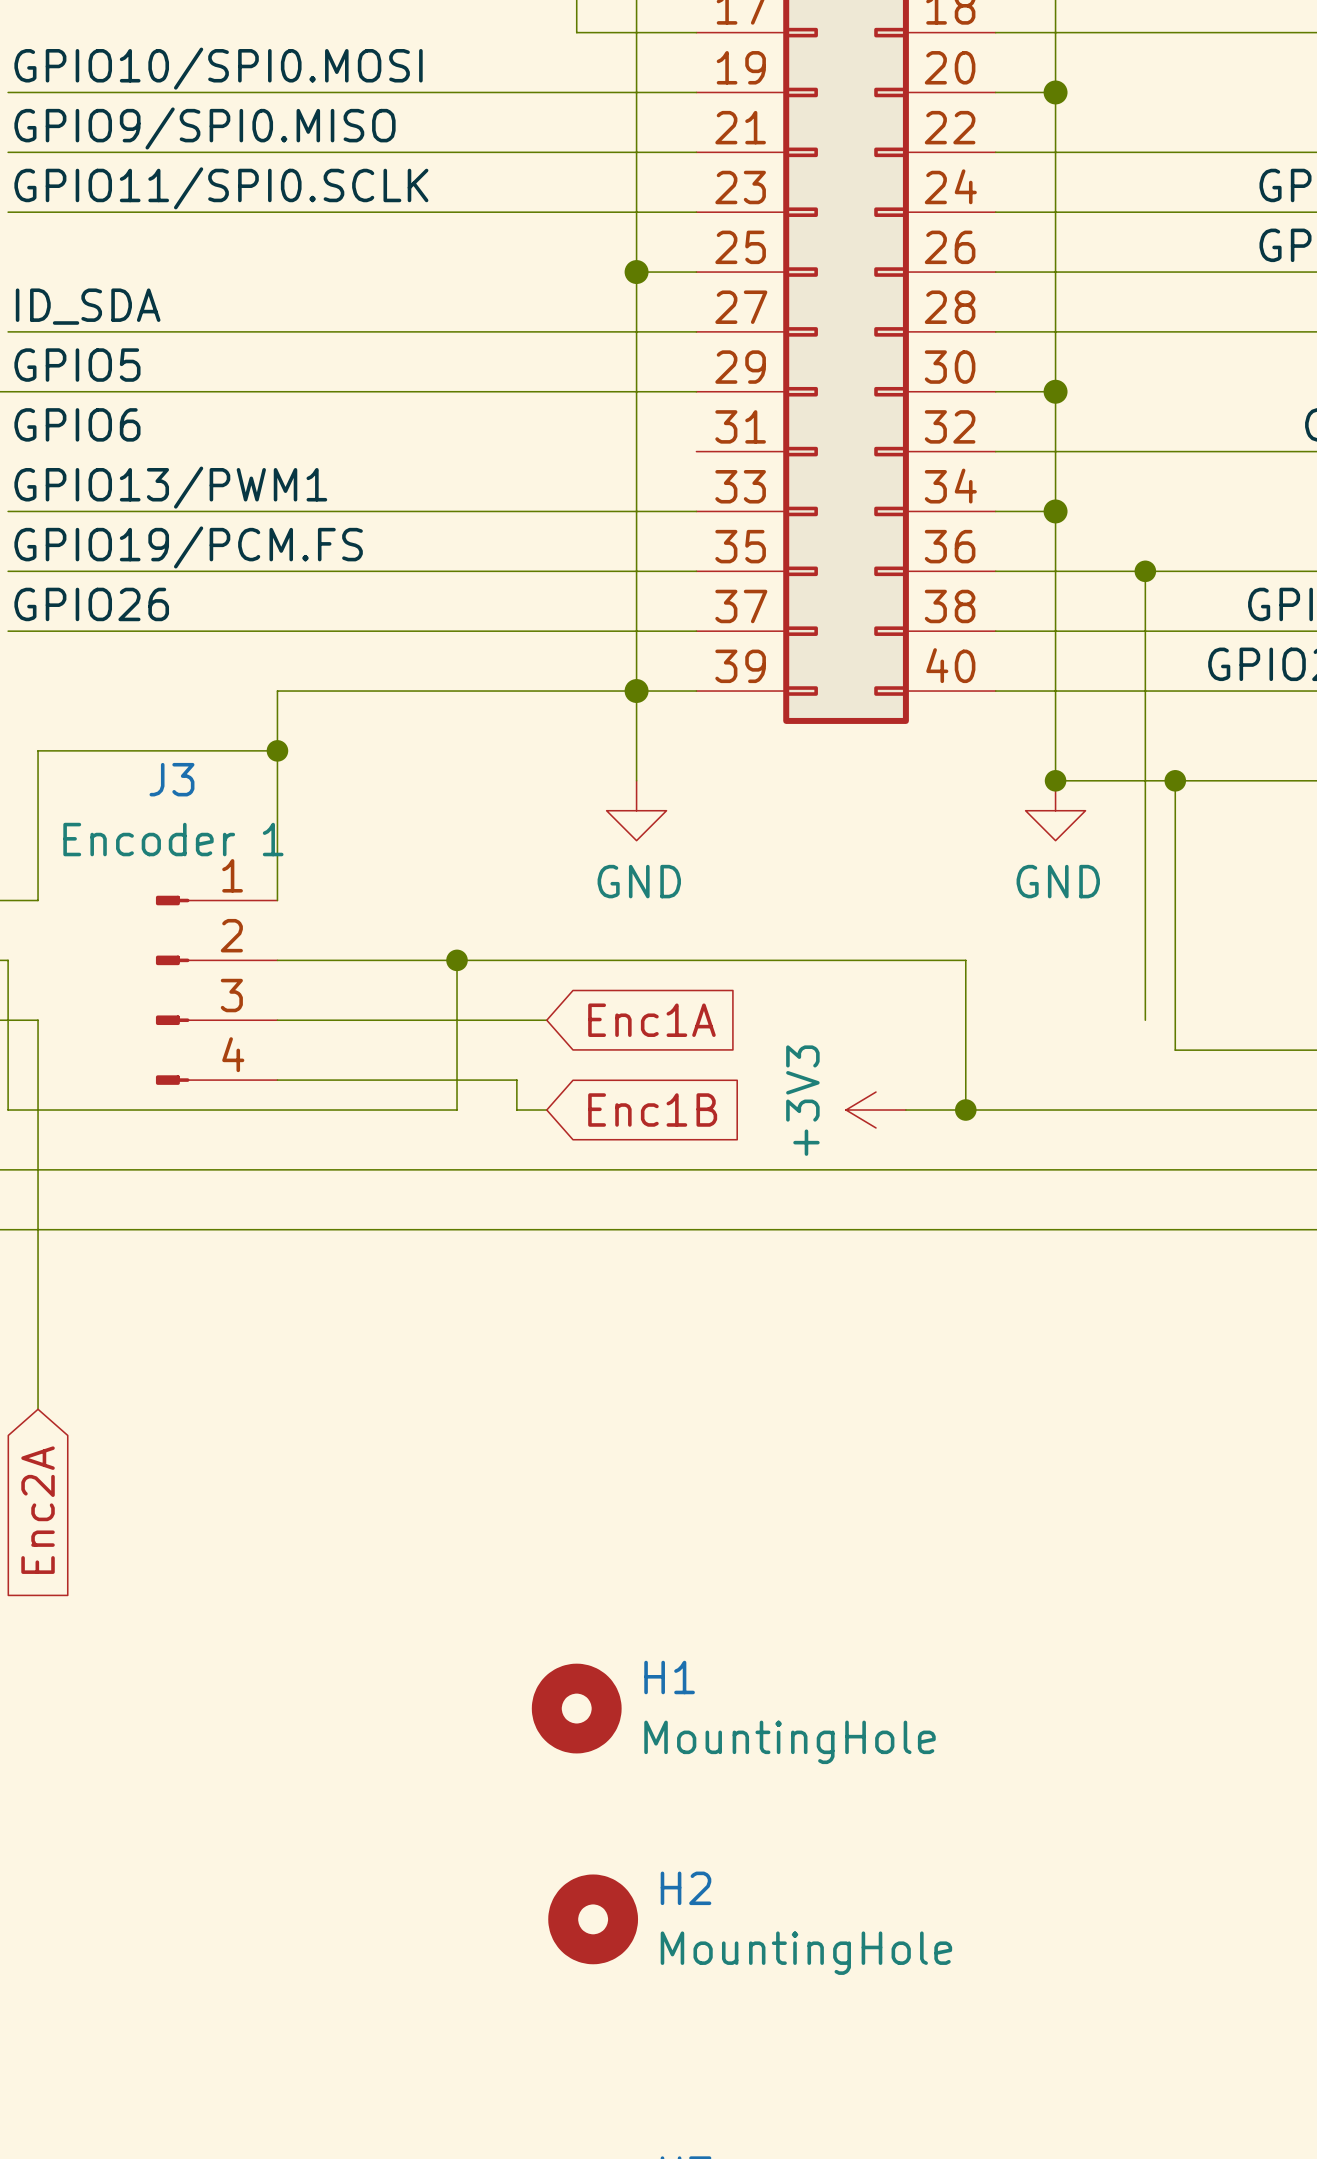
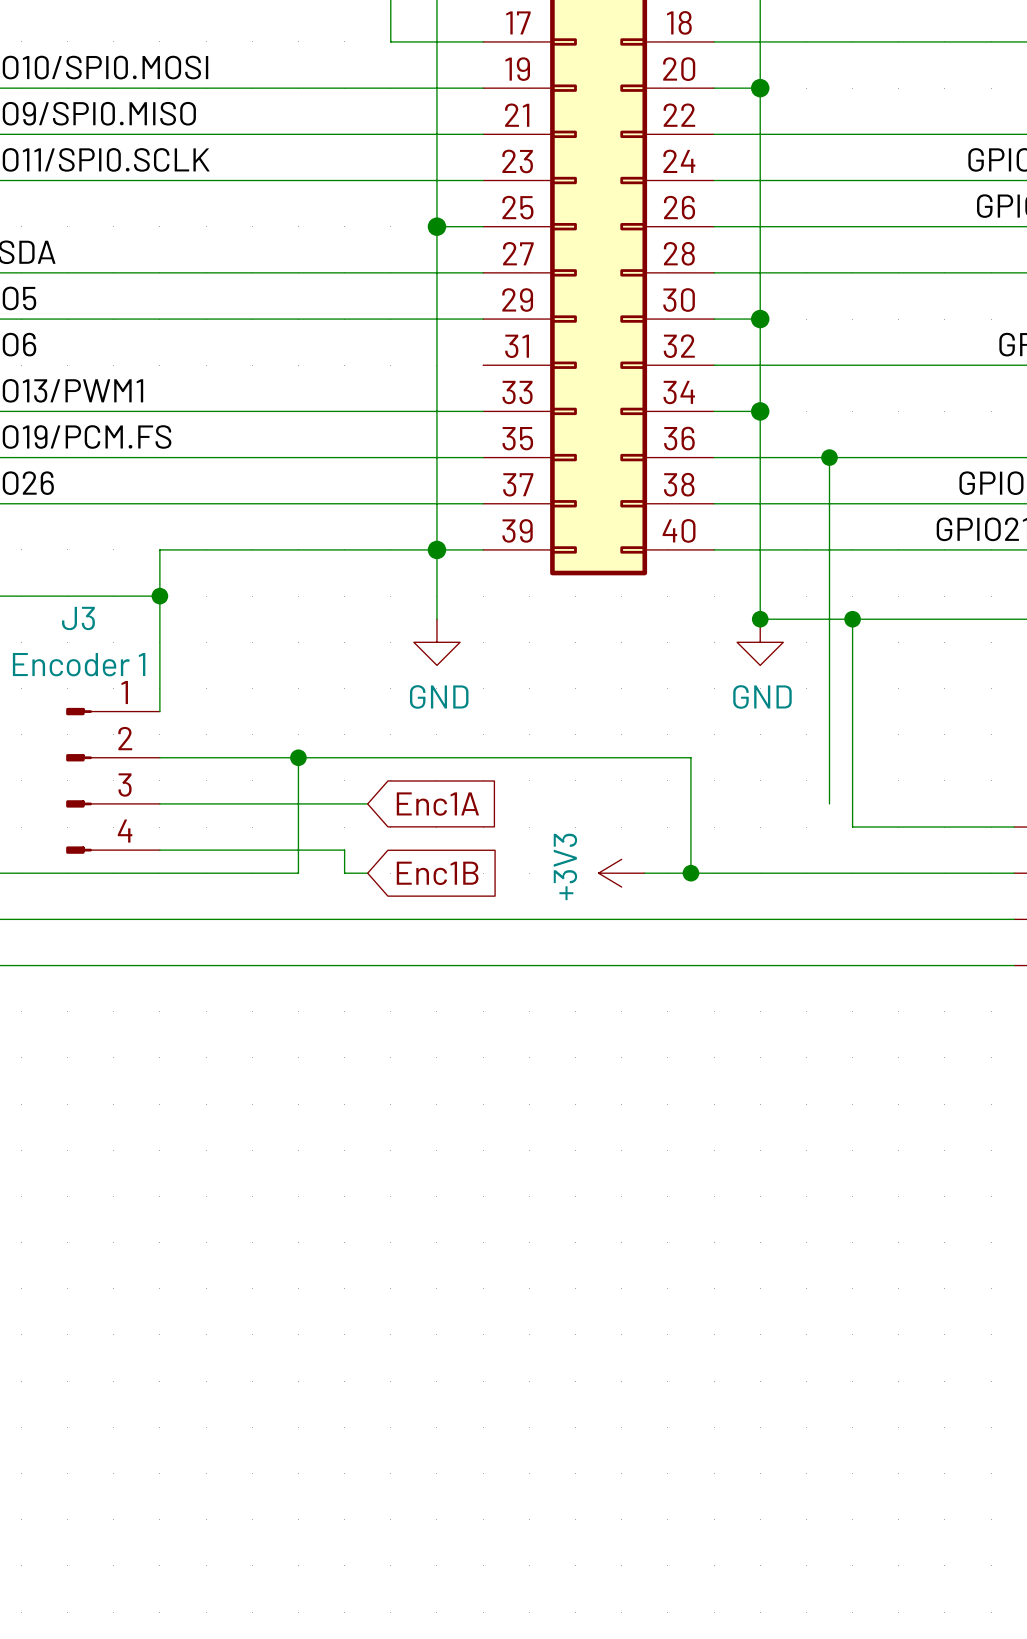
H1: MountingHole (576, 1708) -> none
H2: MountingHole (593, 1919) -> none

